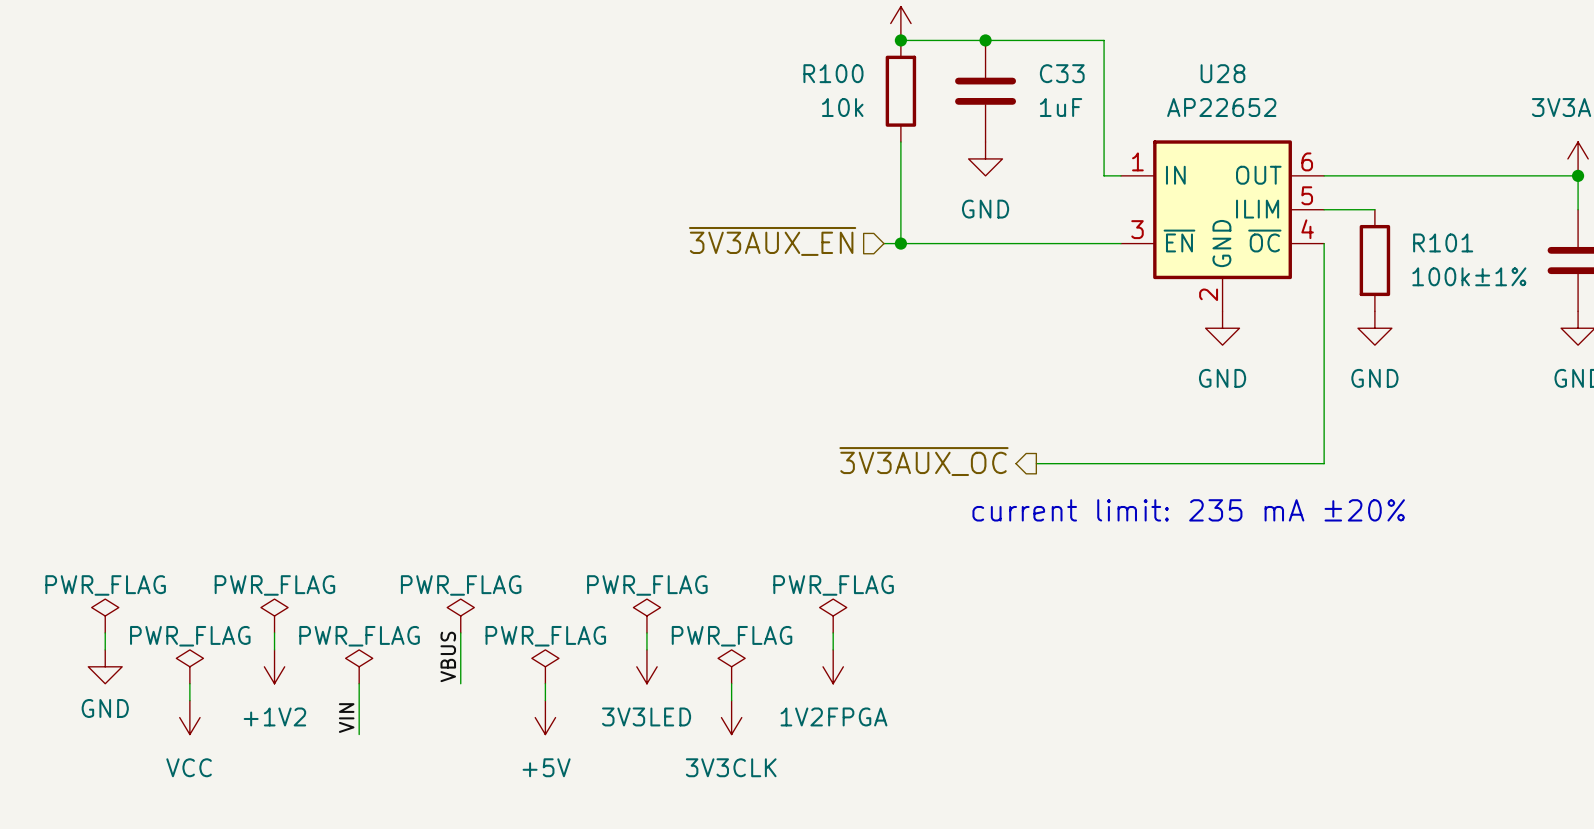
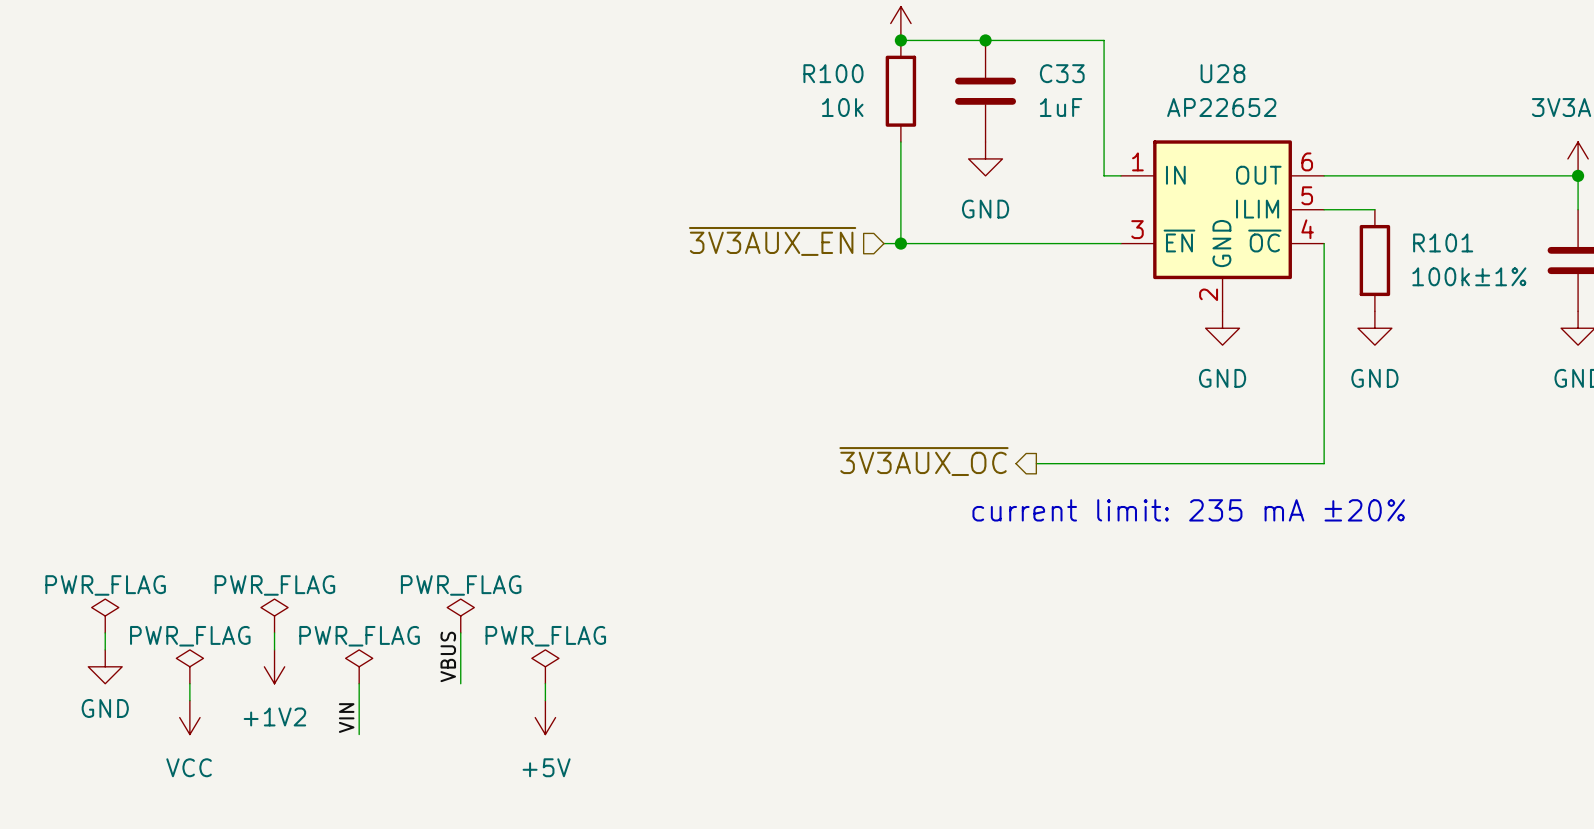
power symbol: PWR_FLAG (646, 616) -> none
power symbol: PWR_FLAG (833, 616) -> none
wire: (646, 632) (646, 649) -> none
wire: (833, 632) (833, 649) -> none
power symbol: 3V3LED (646, 666) -> none
power symbol: PWR_FLAG (731, 666) -> none
power symbol: 1V2FPGA (833, 666) -> none
wire: (731, 683) (731, 700) -> none
power symbol: 3V3CLK (731, 717) -> none

